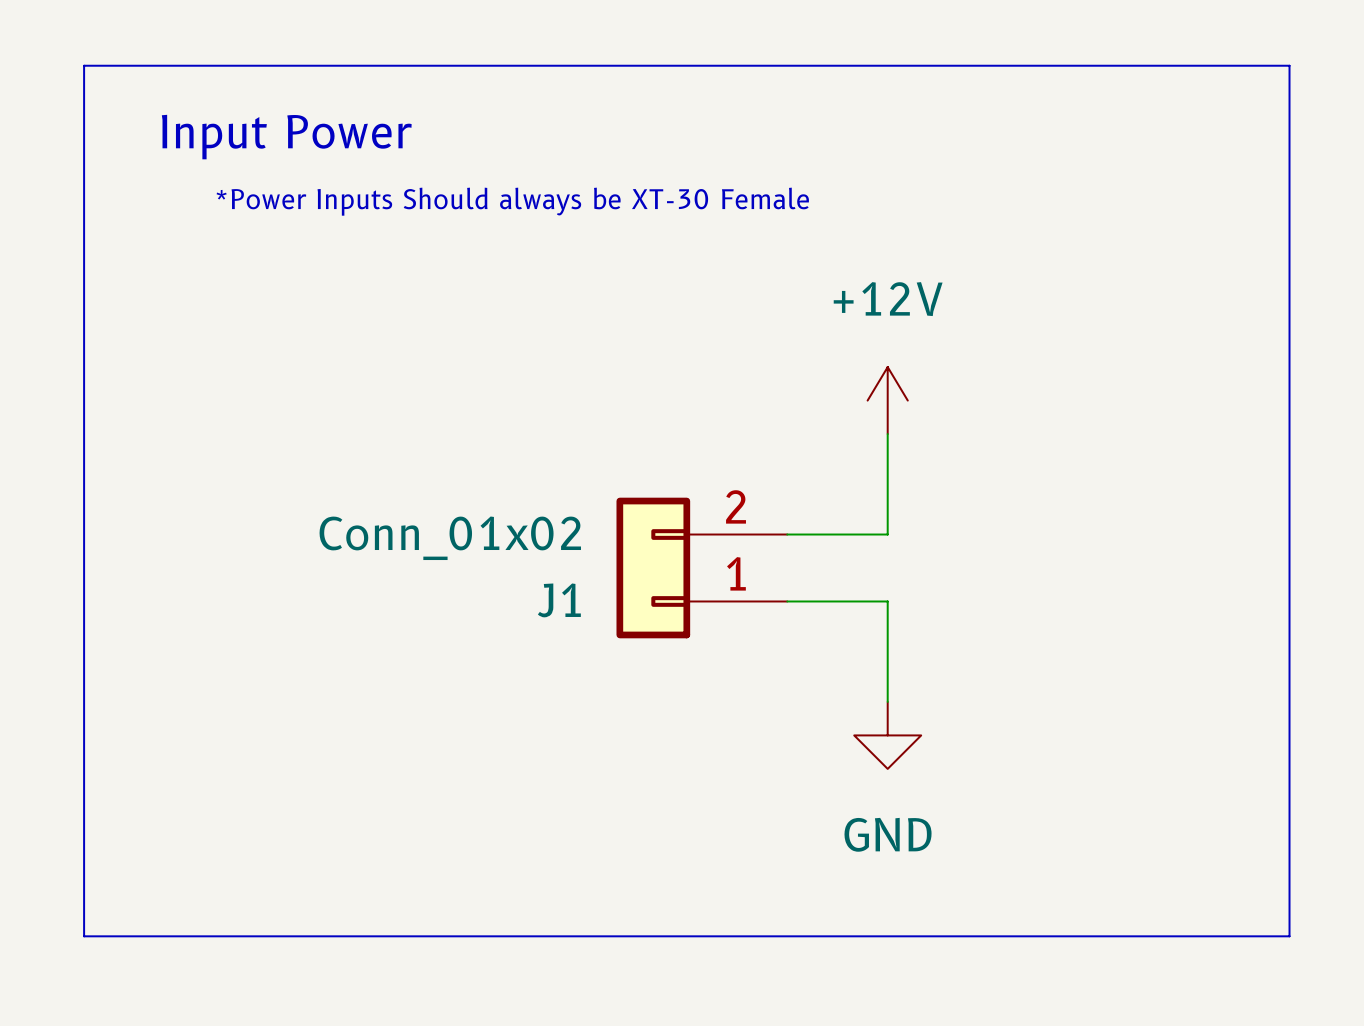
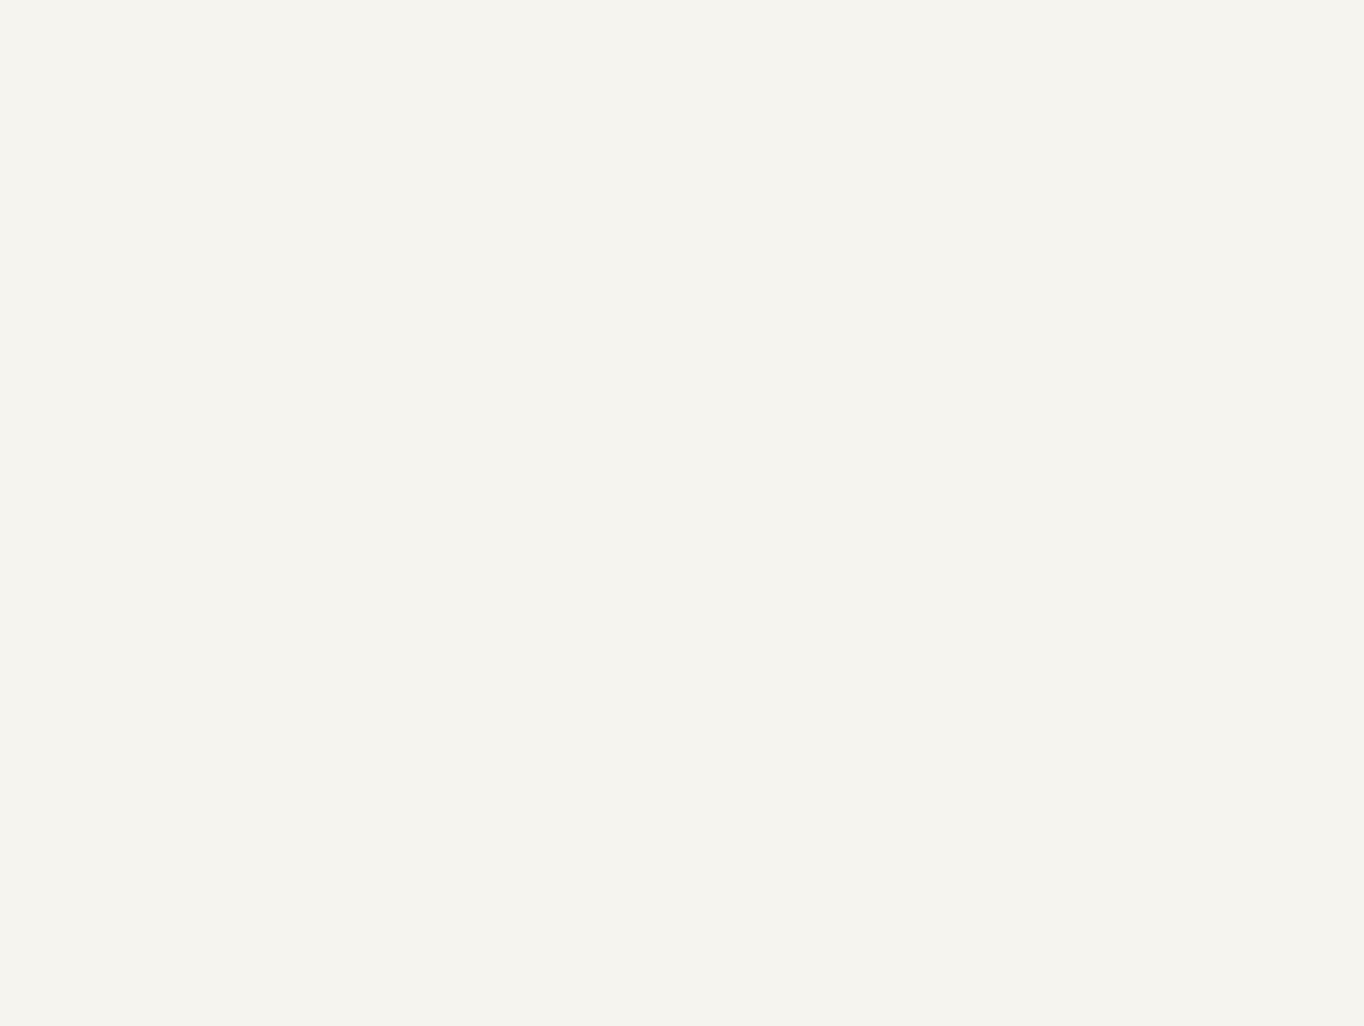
line: (84, 65) (1289, 65) (1289, 936) (84, 936) (84, 65) -> none
text: Input Power (286, 137) -> none
text: *Power Inputs Should always be XT-30 Female (512, 201) -> none
power symbol: +12V (887, 400) -> none
wire: (887, 434) (887, 534) (787, 534) -> none
J1: Conn_01x02 (701, 567) -> none
wire: (787, 601) (887, 601) (887, 701) -> none
power symbol: GND (887, 735) -> none

